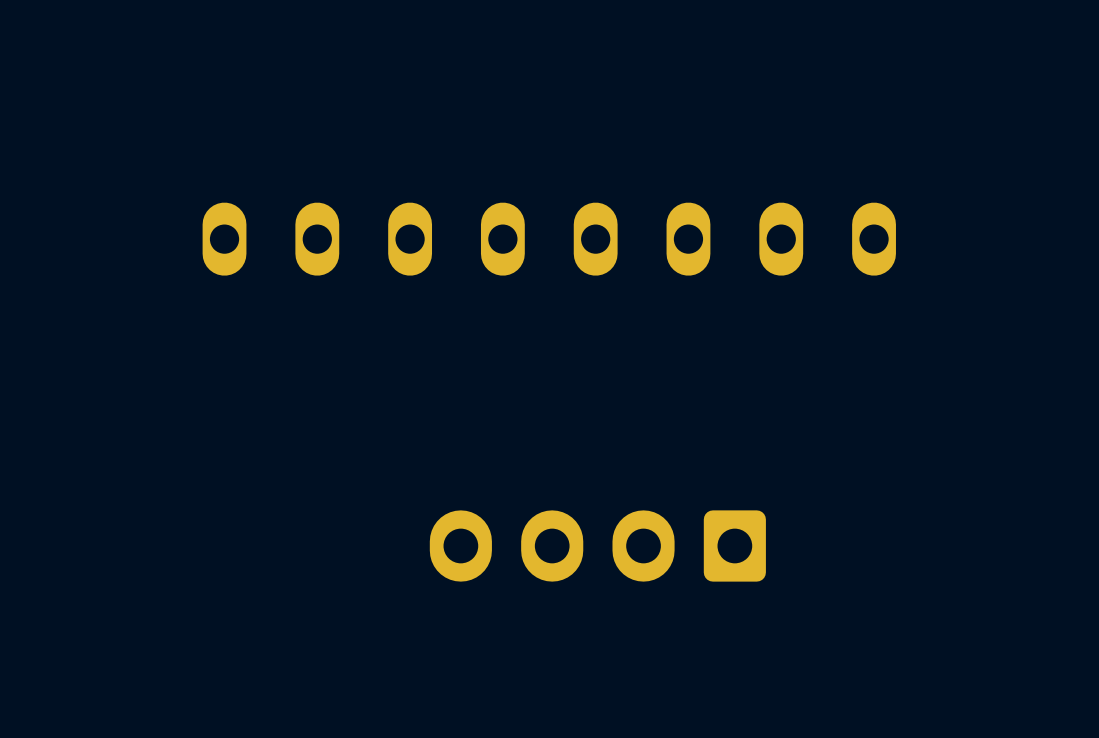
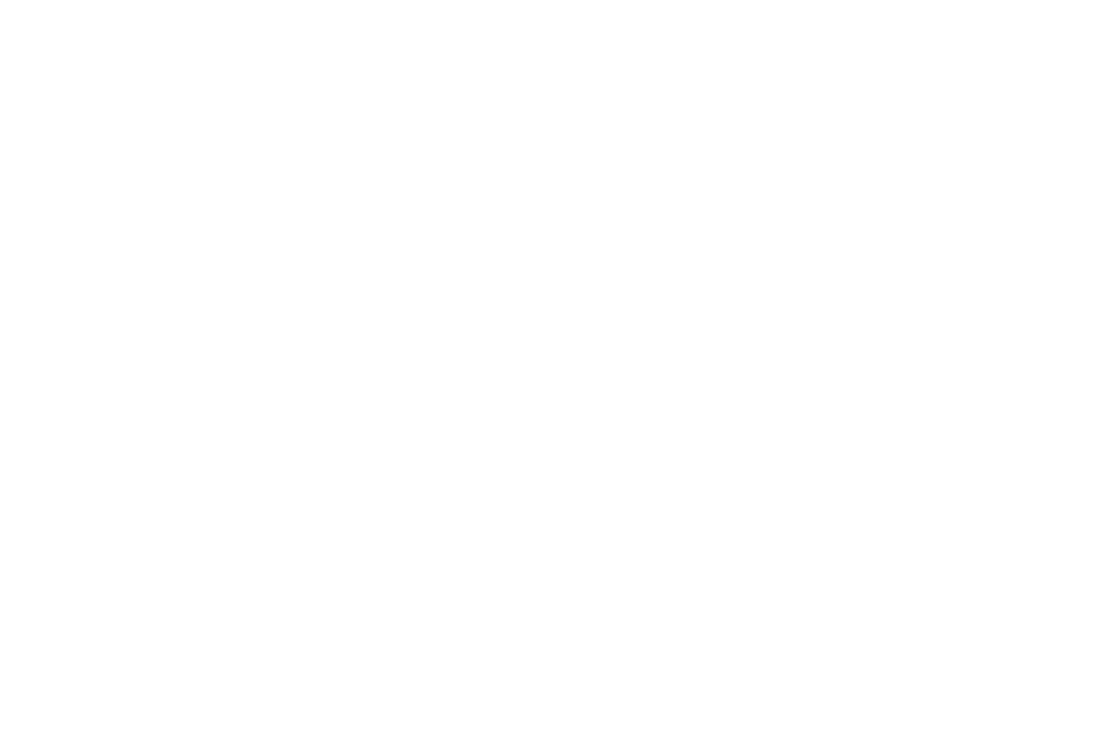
part: (549, 239) -> none
part: (597, 545) -> none

